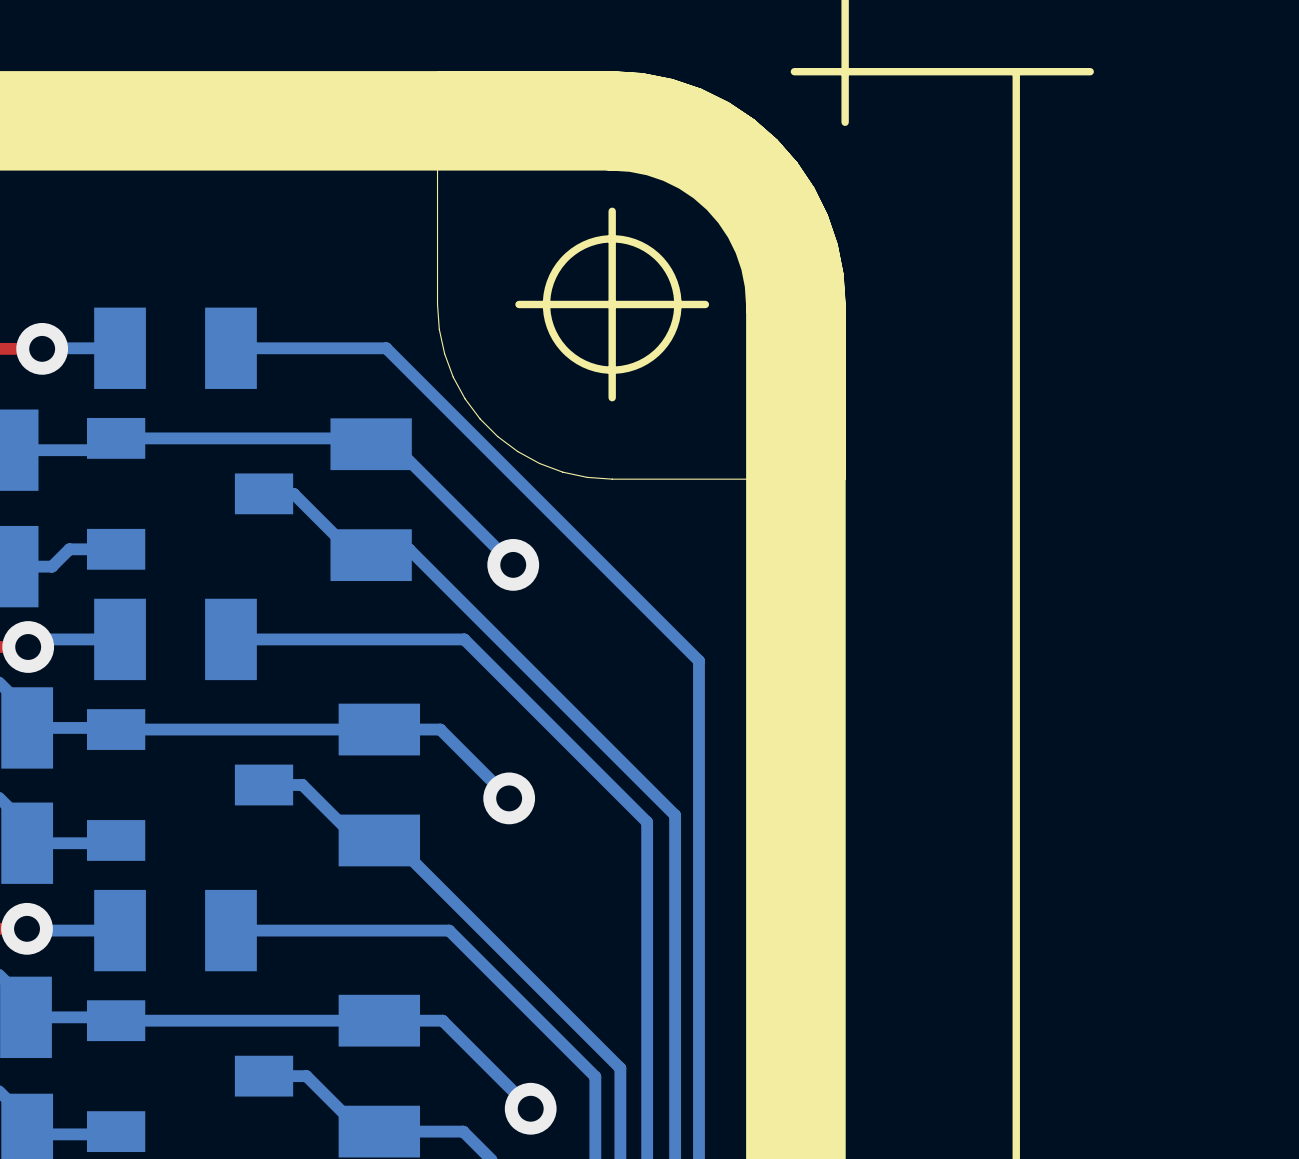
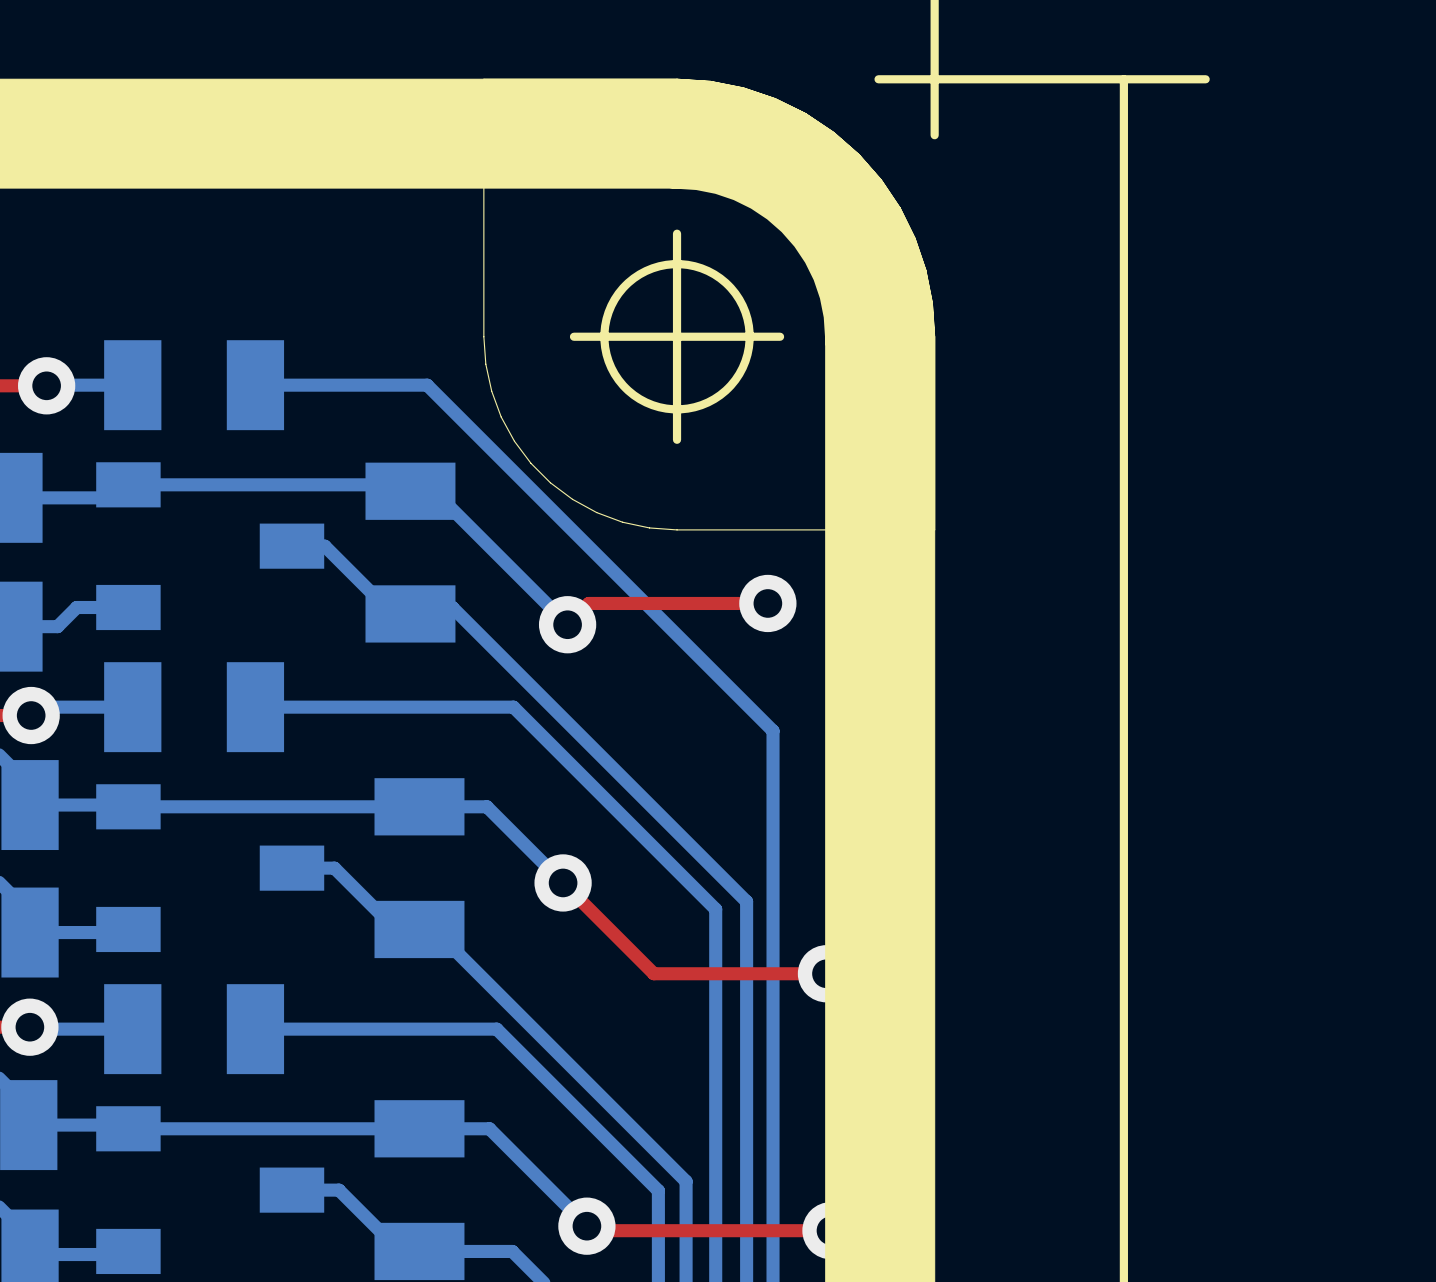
top track: none -> (767, 603) (588, 603) (567, 624)
via: none -> (767, 603)
top track: none -> (563, 882) (653, 973) (826, 973)
via: none -> (826, 973)
top track: none -> (591, 1230) (830, 1230)
via: none -> (830, 1230)

